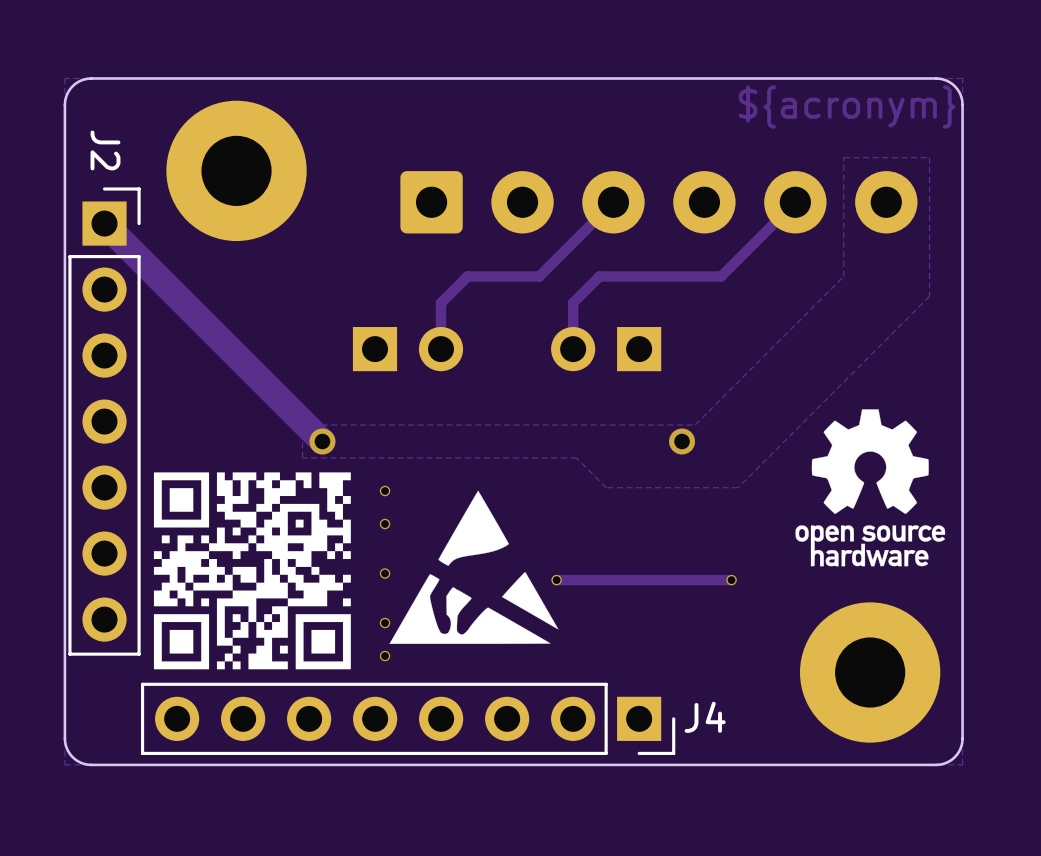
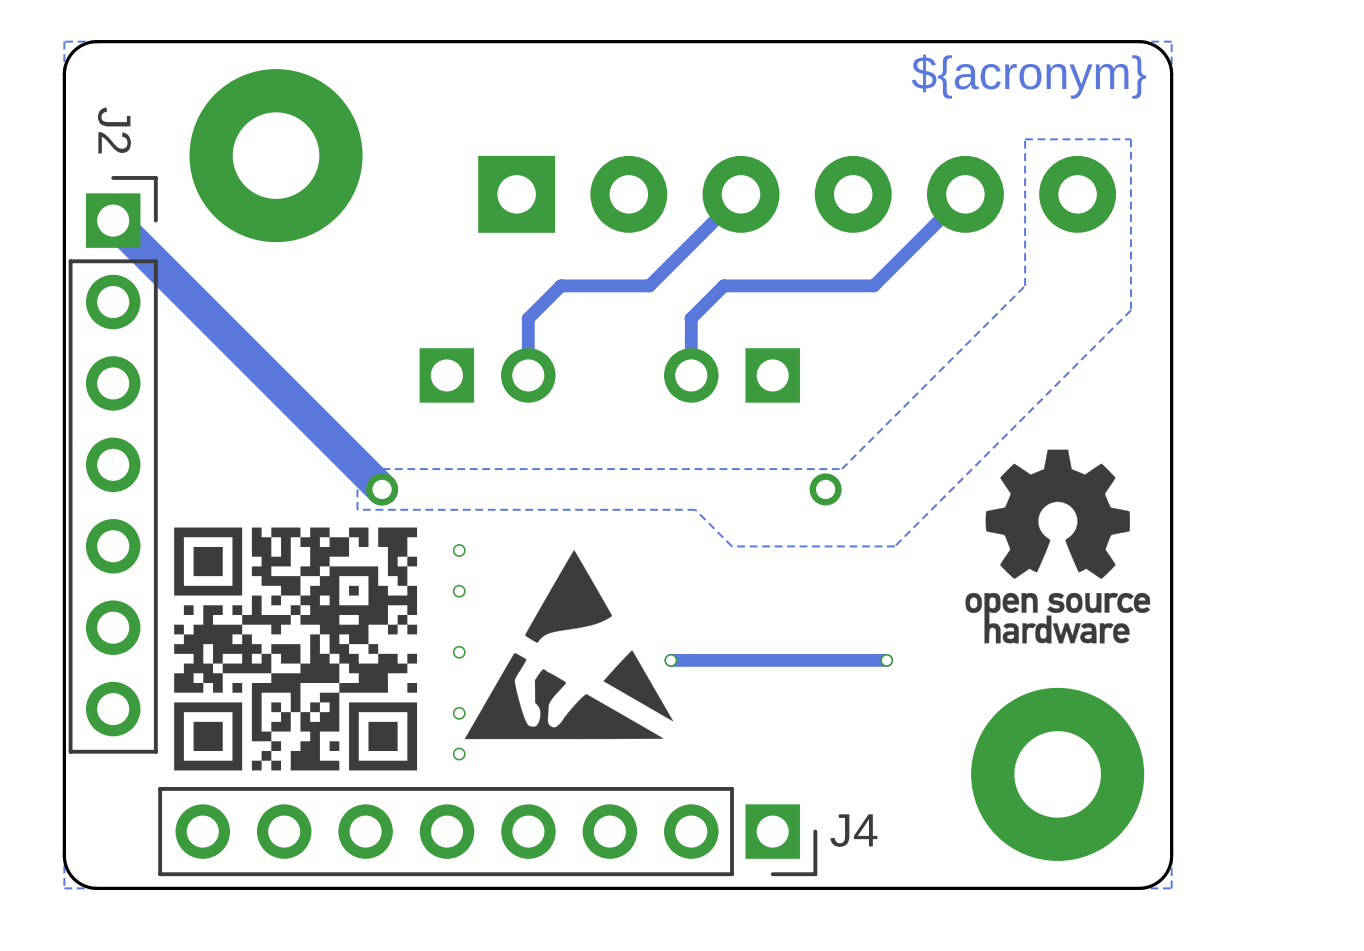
part footprint: [400, 171, 918, 234] -> [478, 155, 1117, 233]

